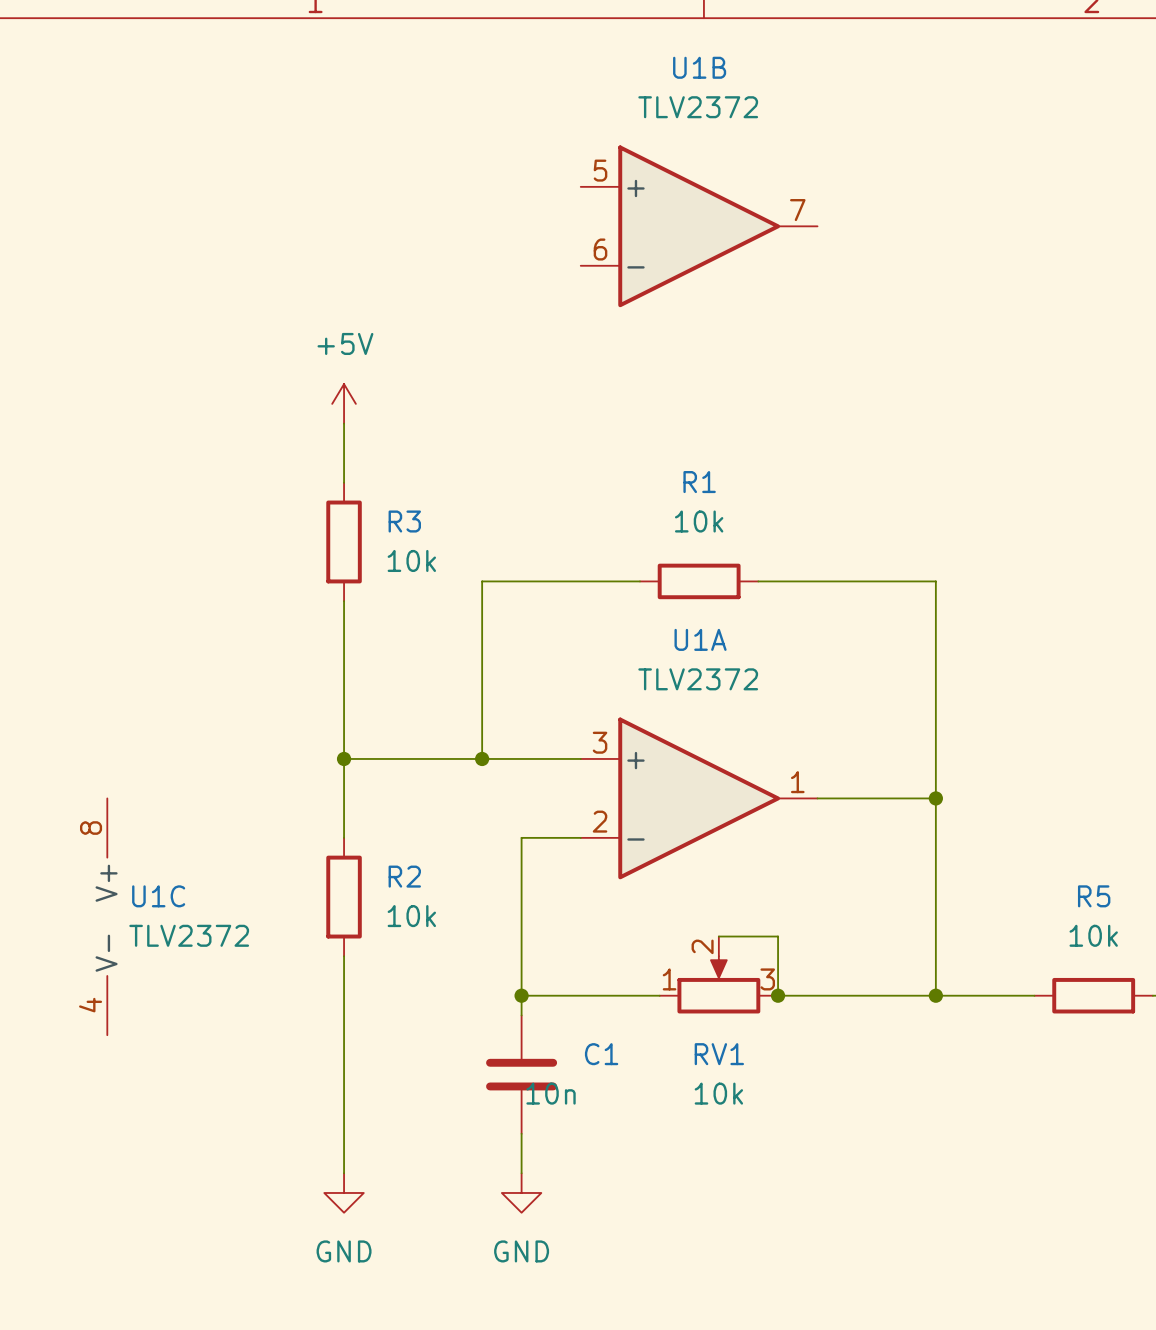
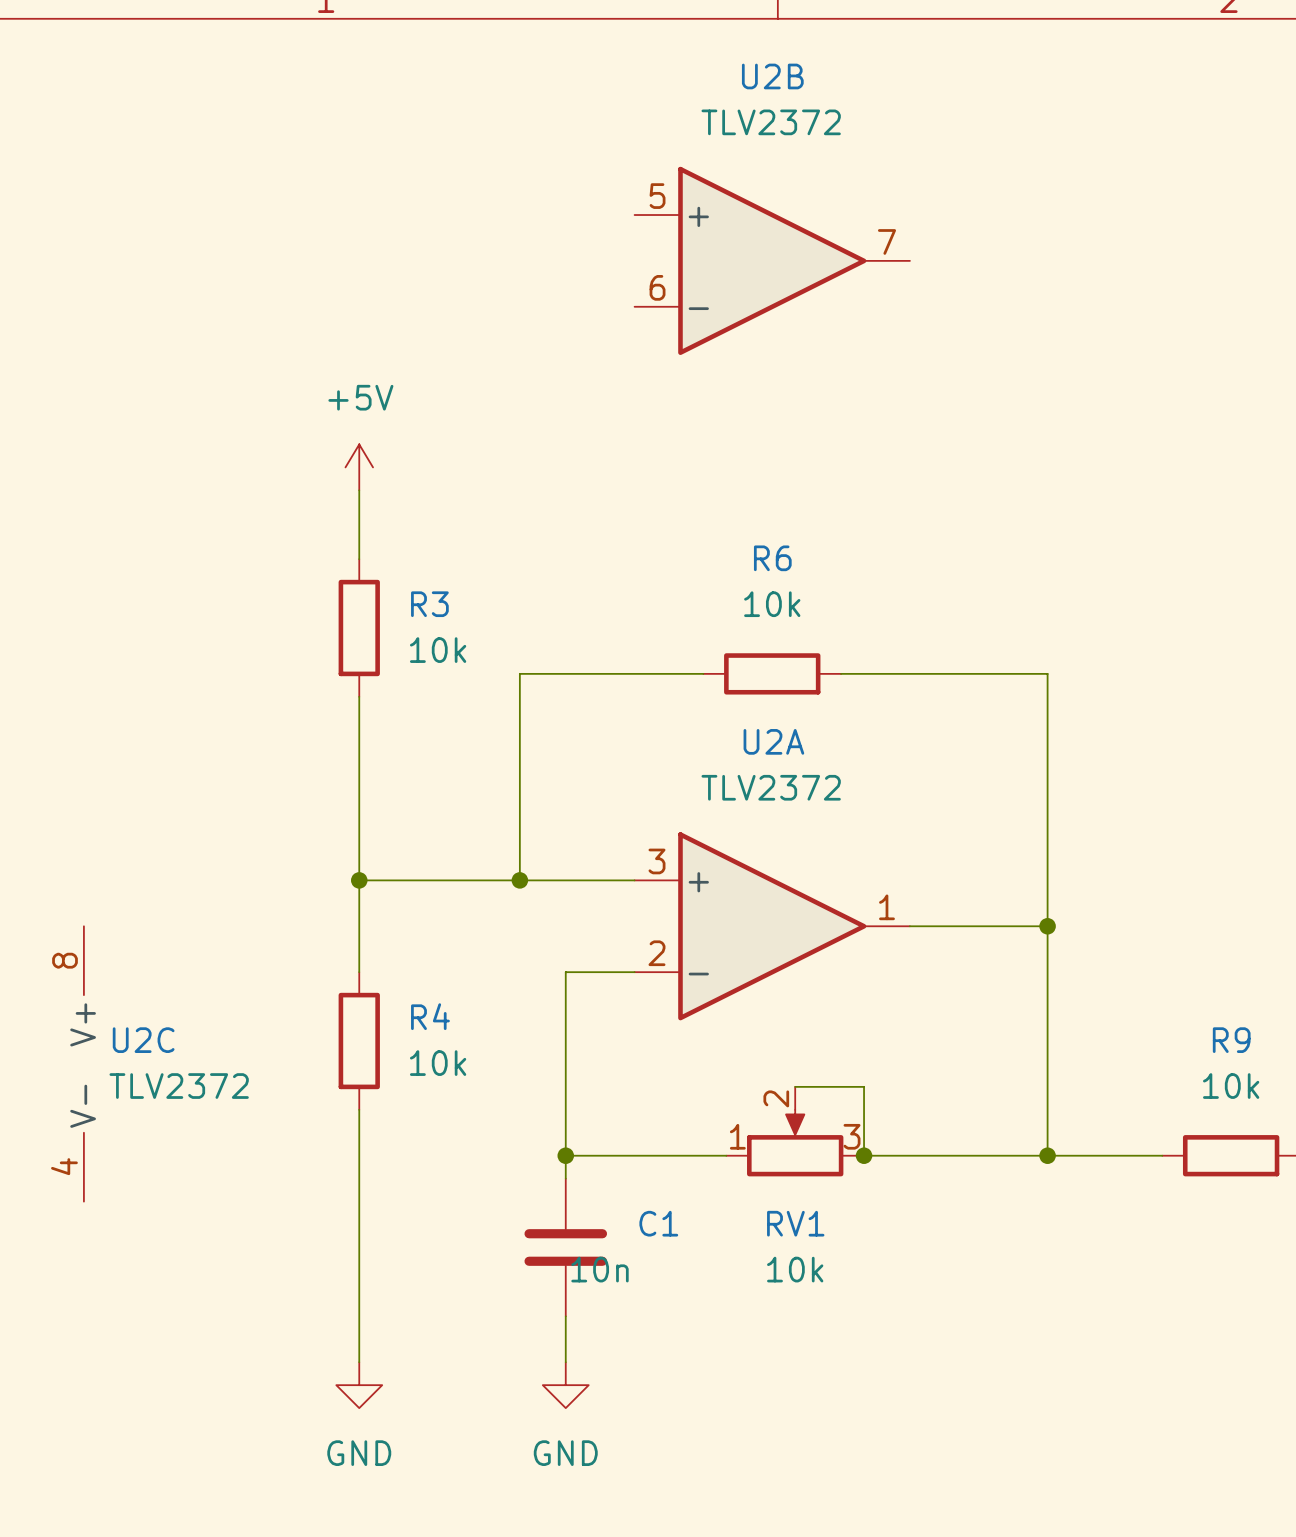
U1B name: U1B (699, 67) -> U2B (772, 76)
R1 name: R1 (699, 482) -> R6 (772, 558)
U1A name: U1A (700, 639) -> U2A (773, 741)
R2 name: R2 (404, 876) -> R4 (430, 1016)
U1C name: U1C (158, 896) -> U2C (143, 1040)
R5 name: R5 (1094, 896) -> R9 (1231, 1040)

